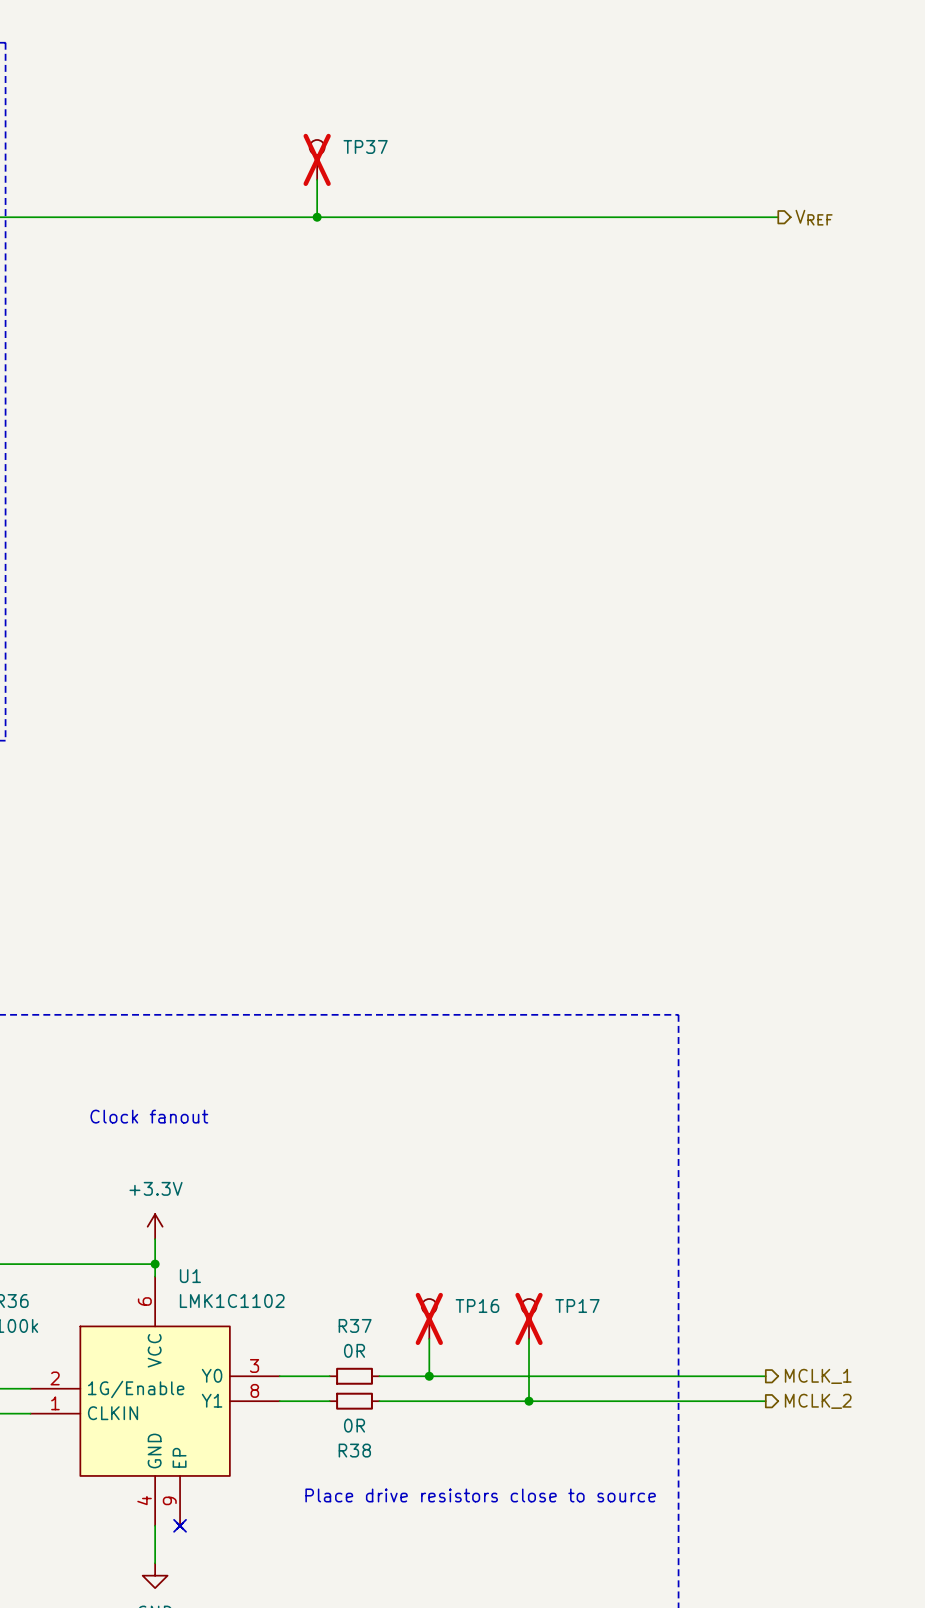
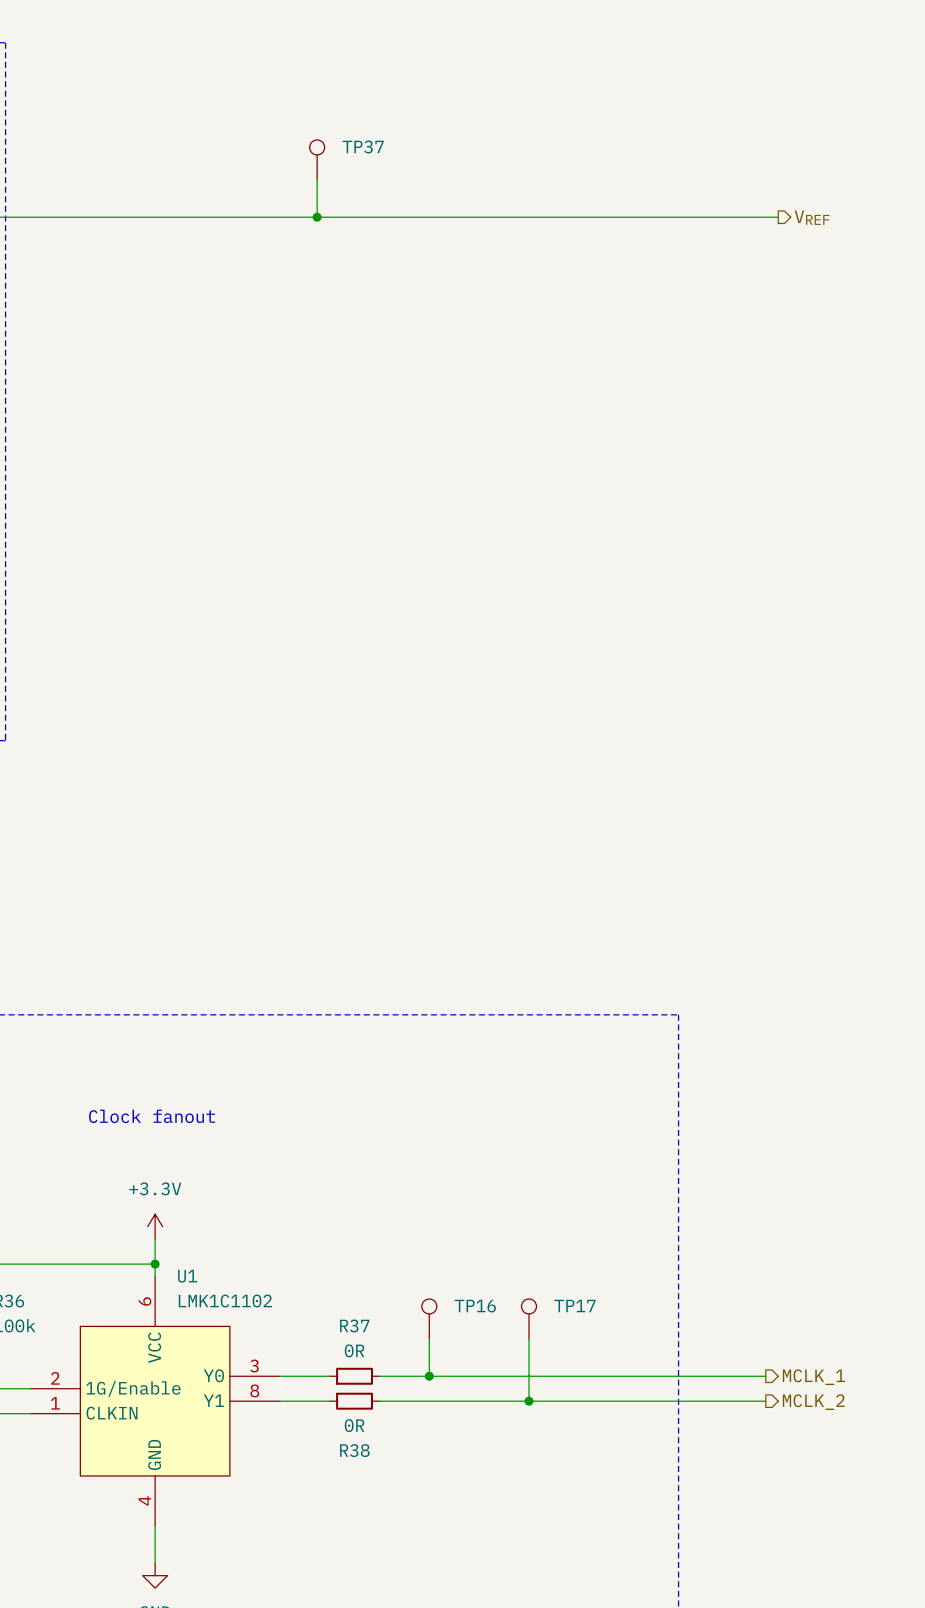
TP37 do-not-place cross: (317, 159) -> none
U1 symbol: [30, 1276, 280, 1529] -> [30, 1276, 280, 1526]
TP16 do-not-place cross: (429, 1318) -> none
TP17 do-not-place cross: (529, 1318) -> none
text: Place drive resistors close to source (480, 1495) -> none
no-connect mark: (180, 1525) -> none

